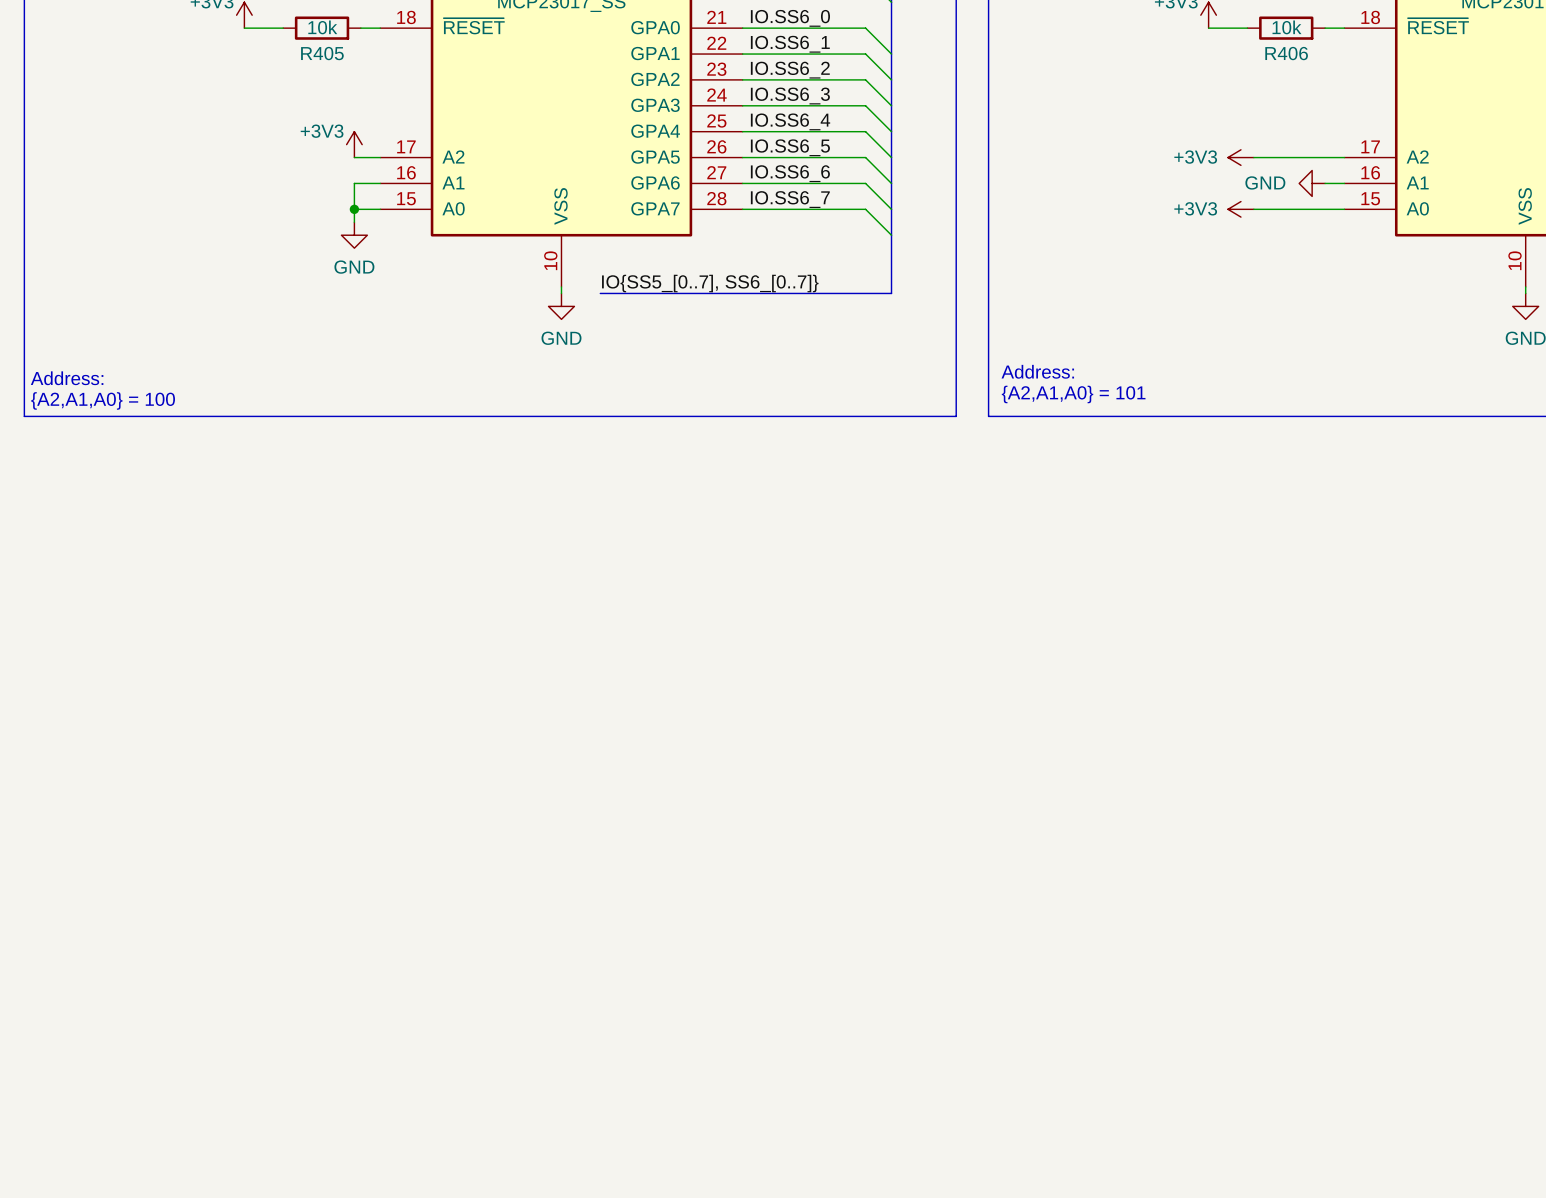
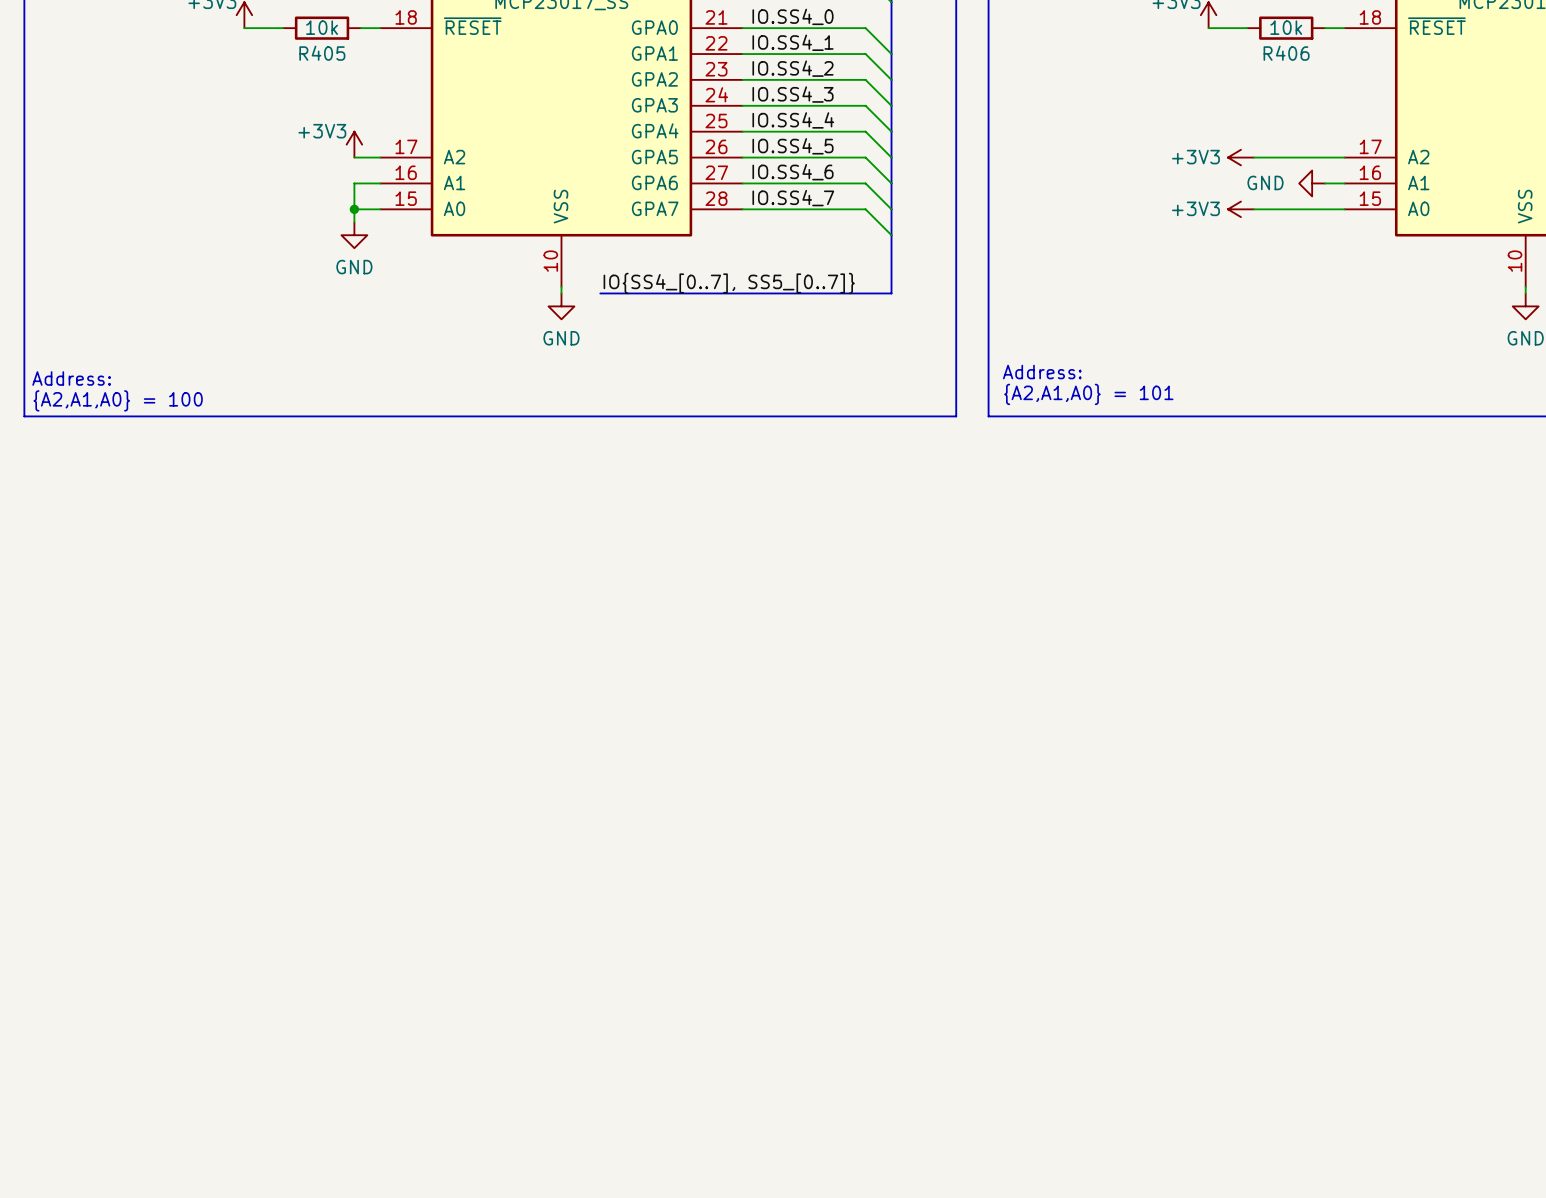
label: IO.SS6_0 (790, 18) -> IO.SS4_0 (793, 16)
label: IO.SS6_1 (790, 44) -> IO.SS4_1 (793, 42)
label: IO.SS6_2 (790, 70) -> IO.SS4_2 (793, 68)
label: IO.SS6_3 (790, 96) -> IO.SS4_3 (793, 94)
label: IO.SS6_4 (790, 121) -> IO.SS4_4 (793, 120)
label: IO.SS6_5 (790, 147) -> IO.SS4_5 (793, 146)
label: IO.SS6_6 (790, 173) -> IO.SS4_6 (793, 172)
label: IO.SS6_7 (790, 199) -> IO.SS4_7 (793, 198)
label: IO{SS5_[0..7], SS6_[0..7]} (710, 283) -> IO{SS4_[0..7], SS5_[0..7]} (729, 283)

